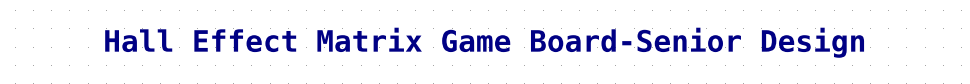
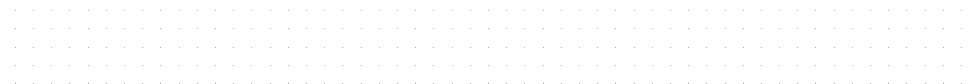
text: Hall Effect Matrix Game Board-Senior Design (484, 42) -> none

